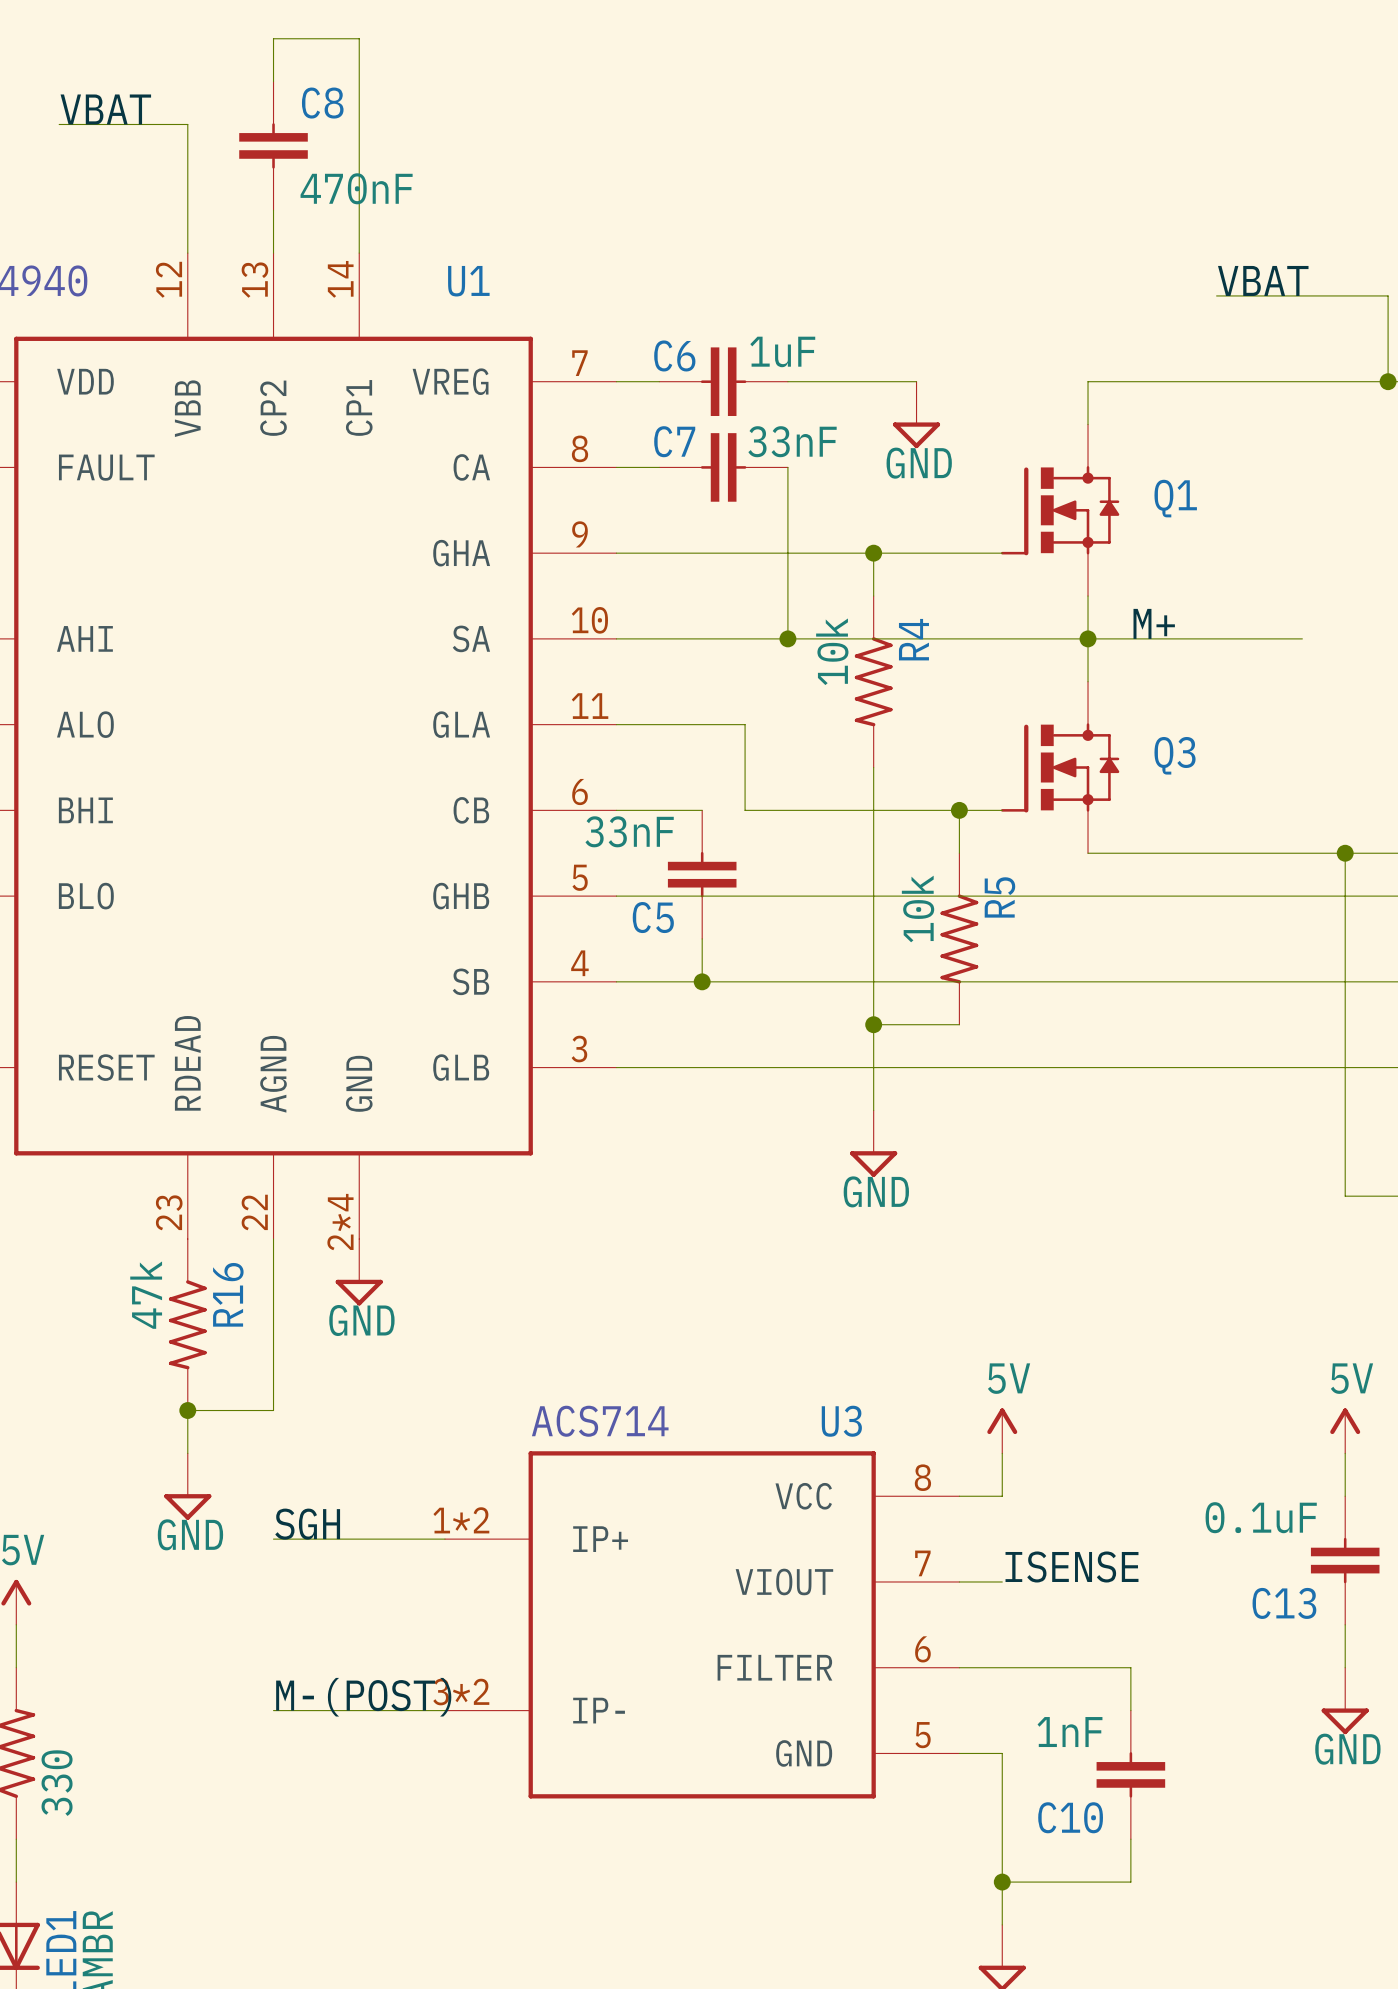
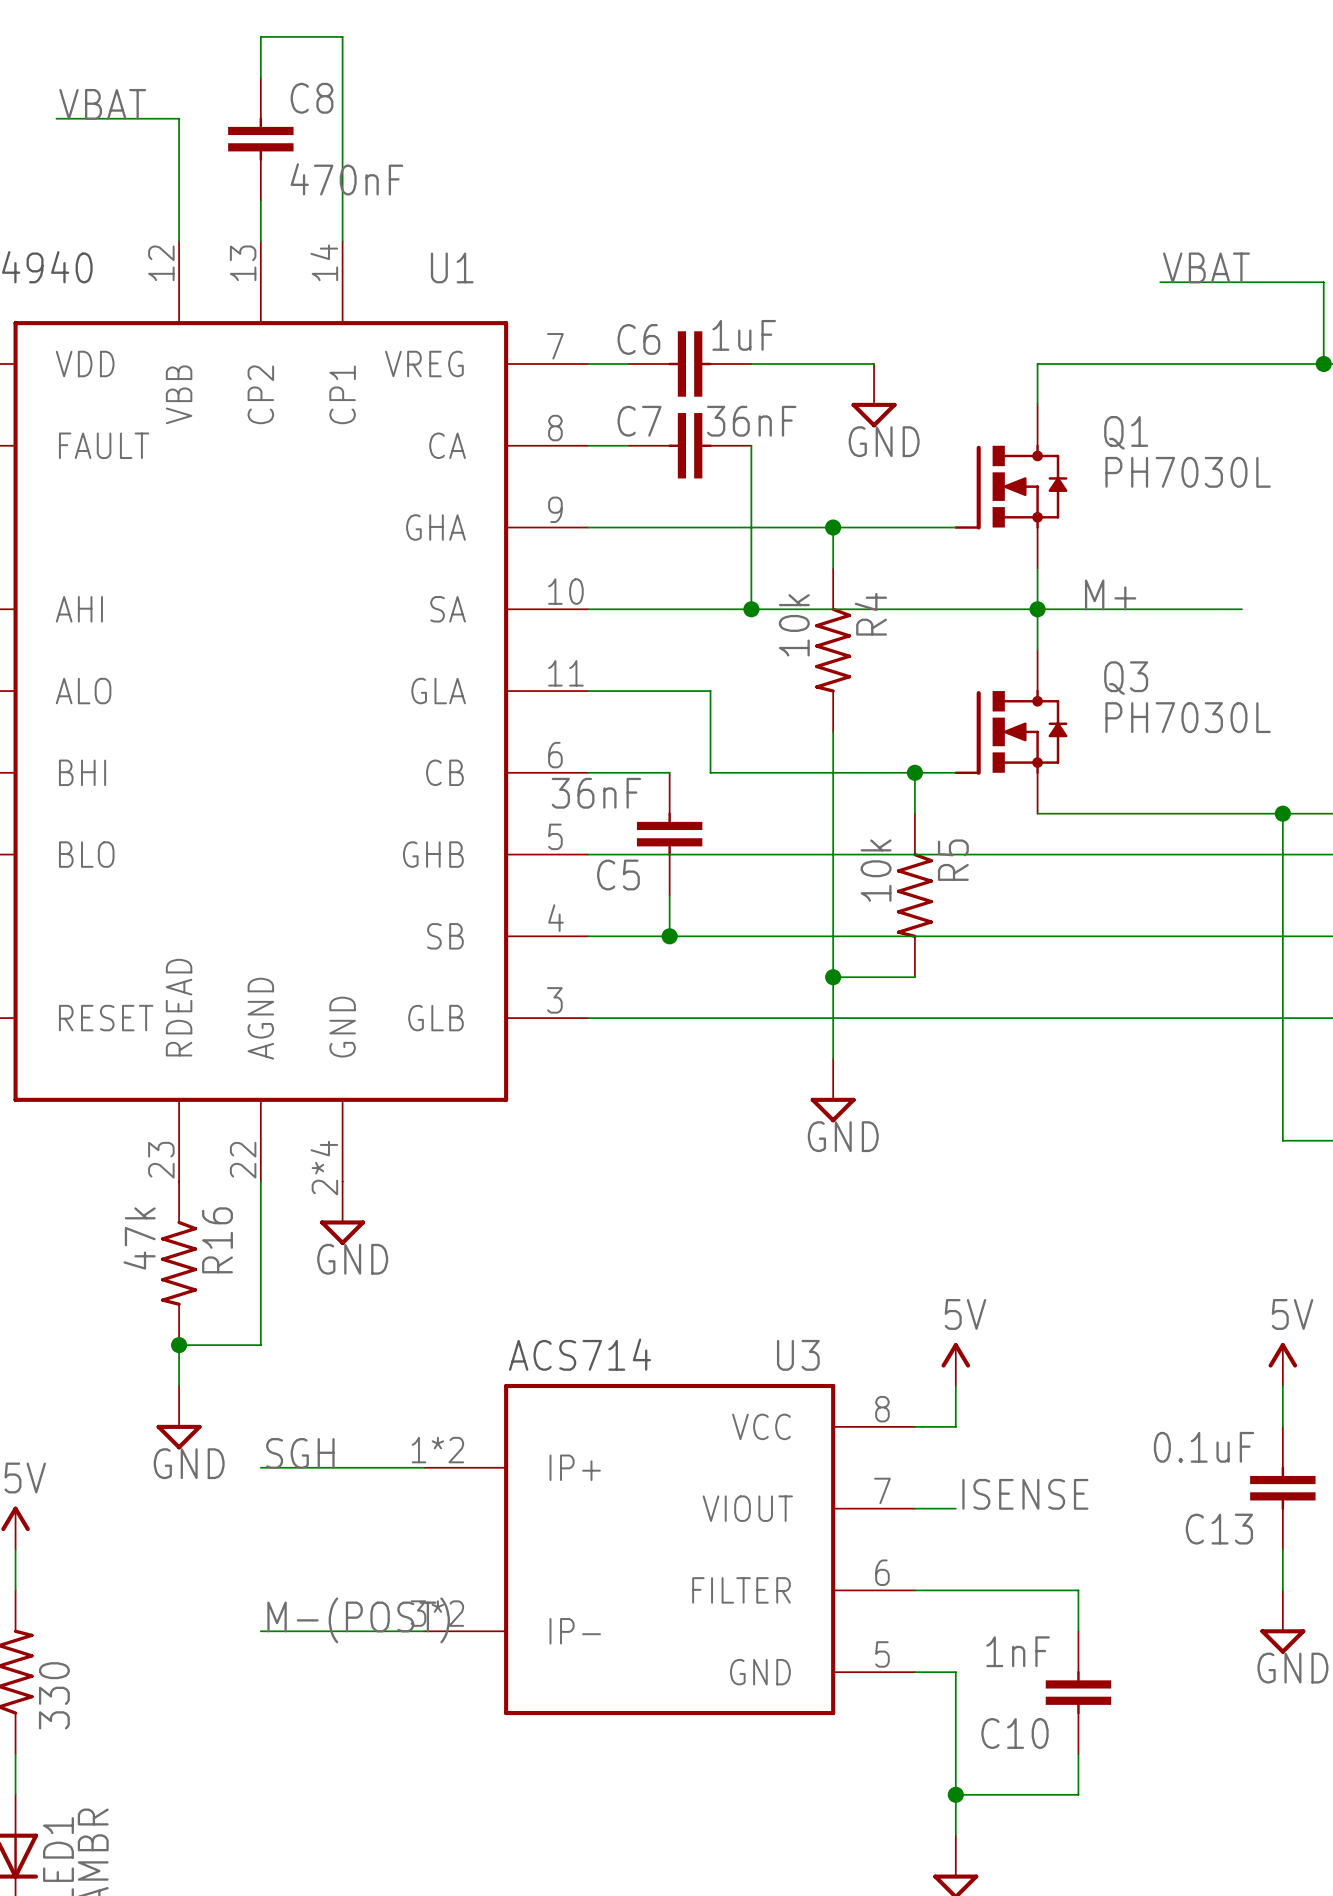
C7 value: 33nF (792, 441) -> 36nF (751, 421)
Q1 value: none -> PH7030L (1188, 472)
Q1 name position: Q1 (1175, 498) -> Q1 (1126, 432)
Q3 value: none -> PH7030L (1188, 717)
Q3 name position: Q3 (1175, 755) -> Q3 (1126, 678)
C5 value: 33nF (629, 831) -> 36nF (596, 793)

